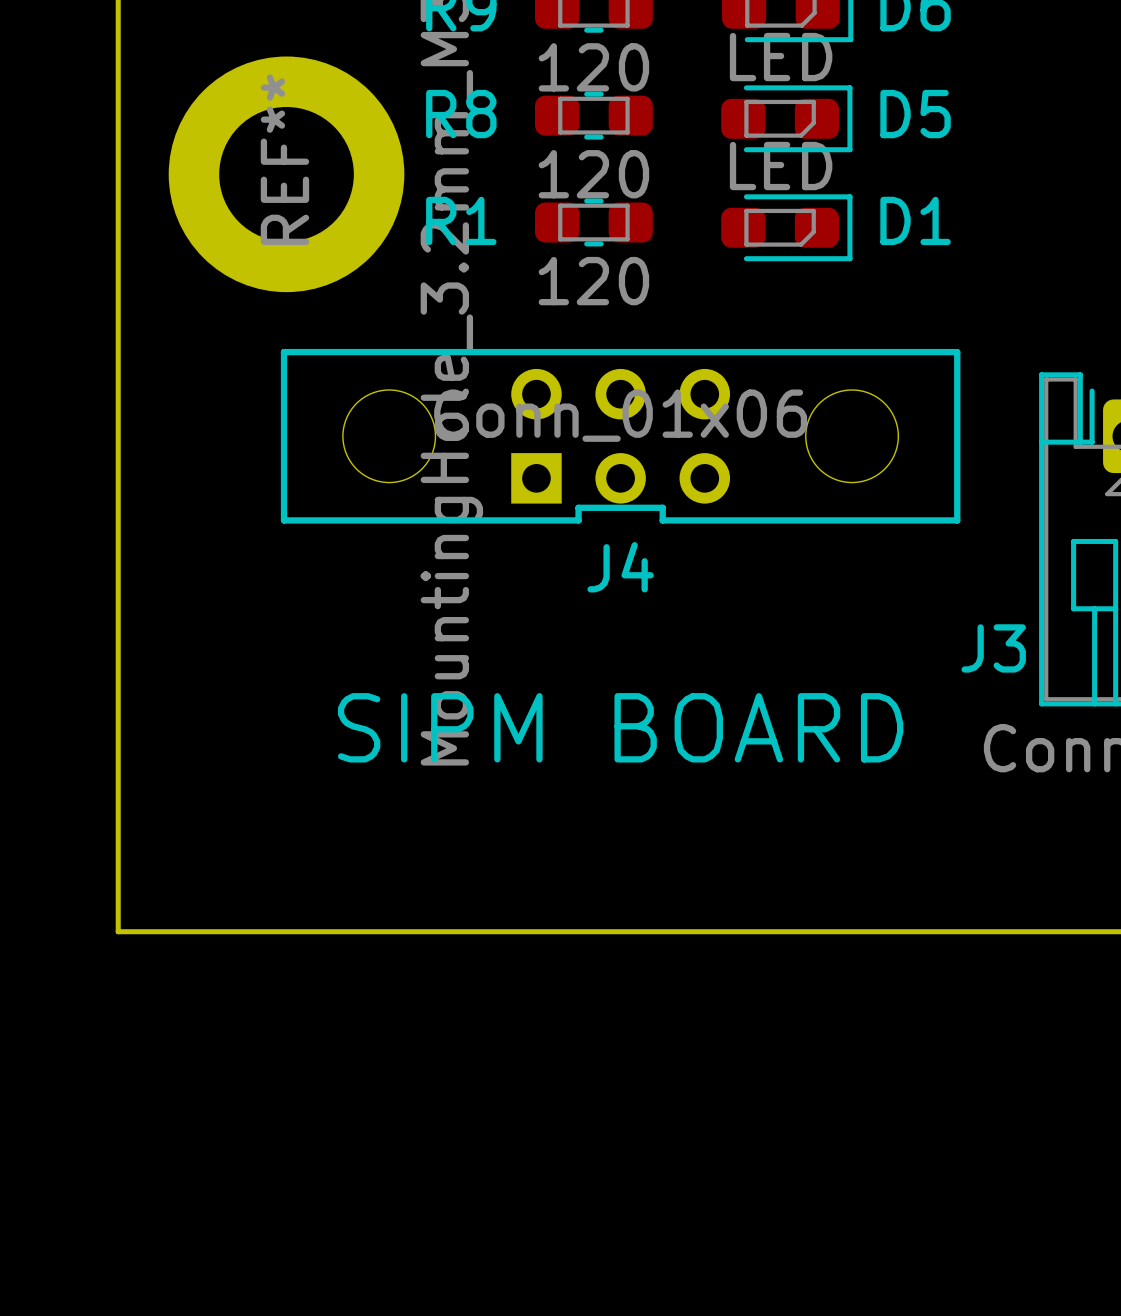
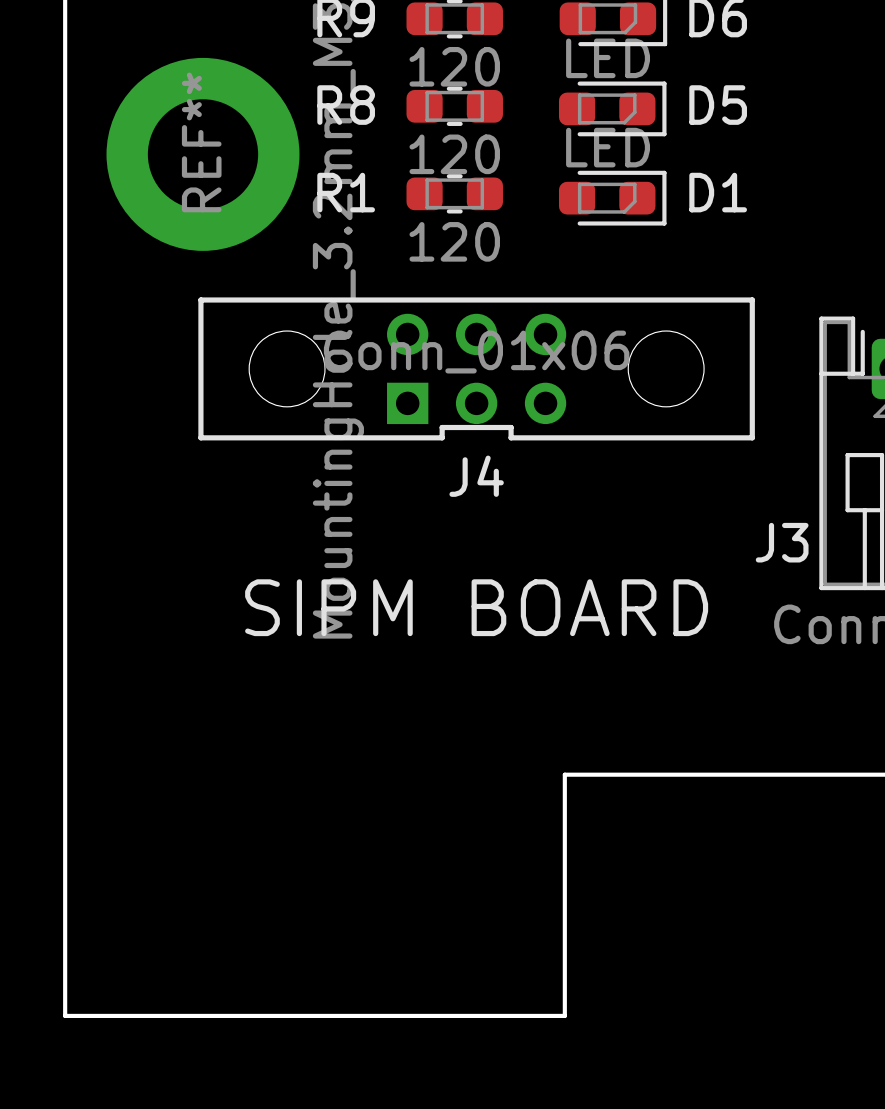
board edge: (118, 931) (728, 931) -> (65, 774) (65, 1015) (564, 1015) (564, 774)

